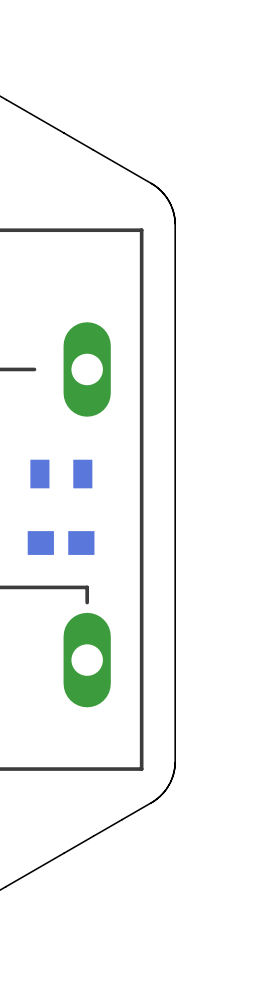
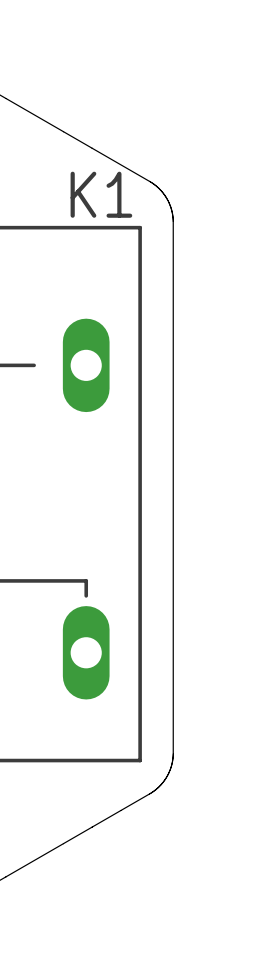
K1 name: none -> K1 (101, 194)
part: (61, 474) -> none
part: (61, 543) -> none

